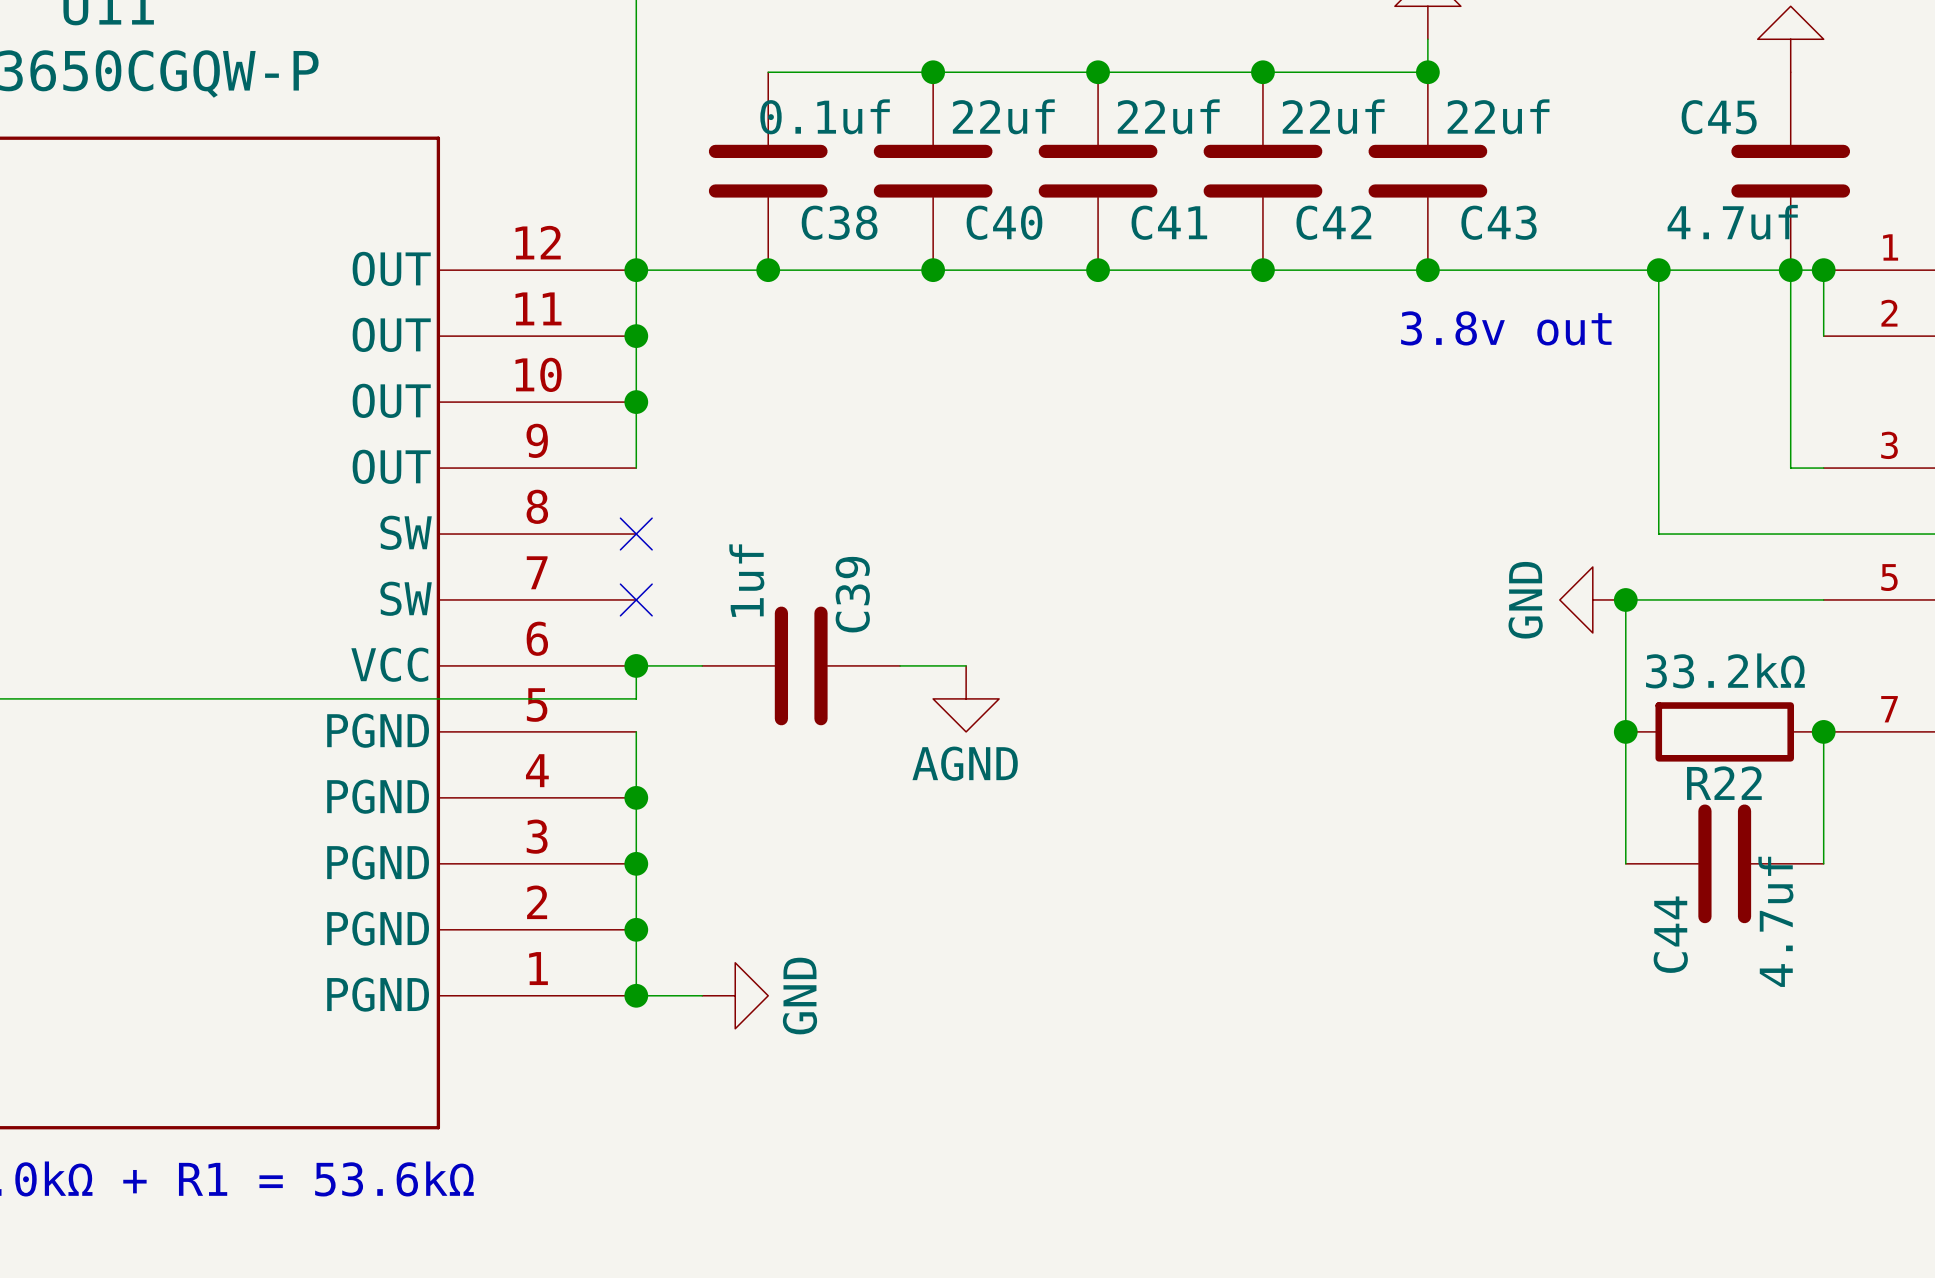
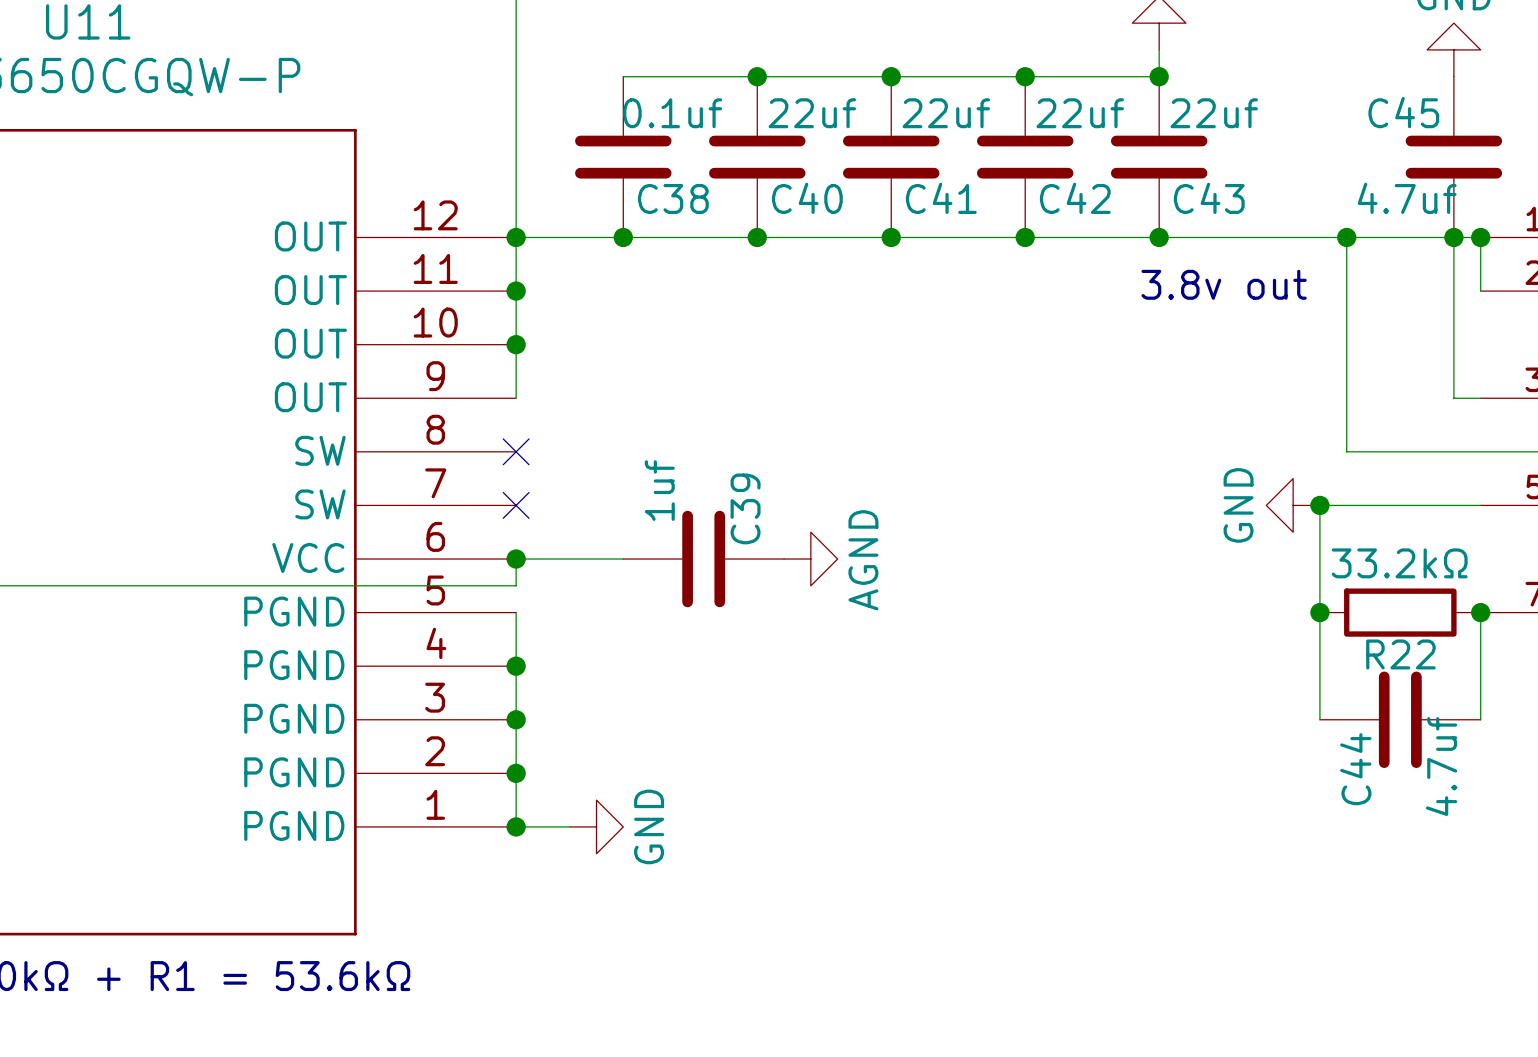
C39 position: (801, 665) -> (703, 559)
power symbol rotation: 0° (966, 698) -> 90° counterclockwise (810, 559)
power symbol position: AGND (966, 698) -> AGND (810, 559)

